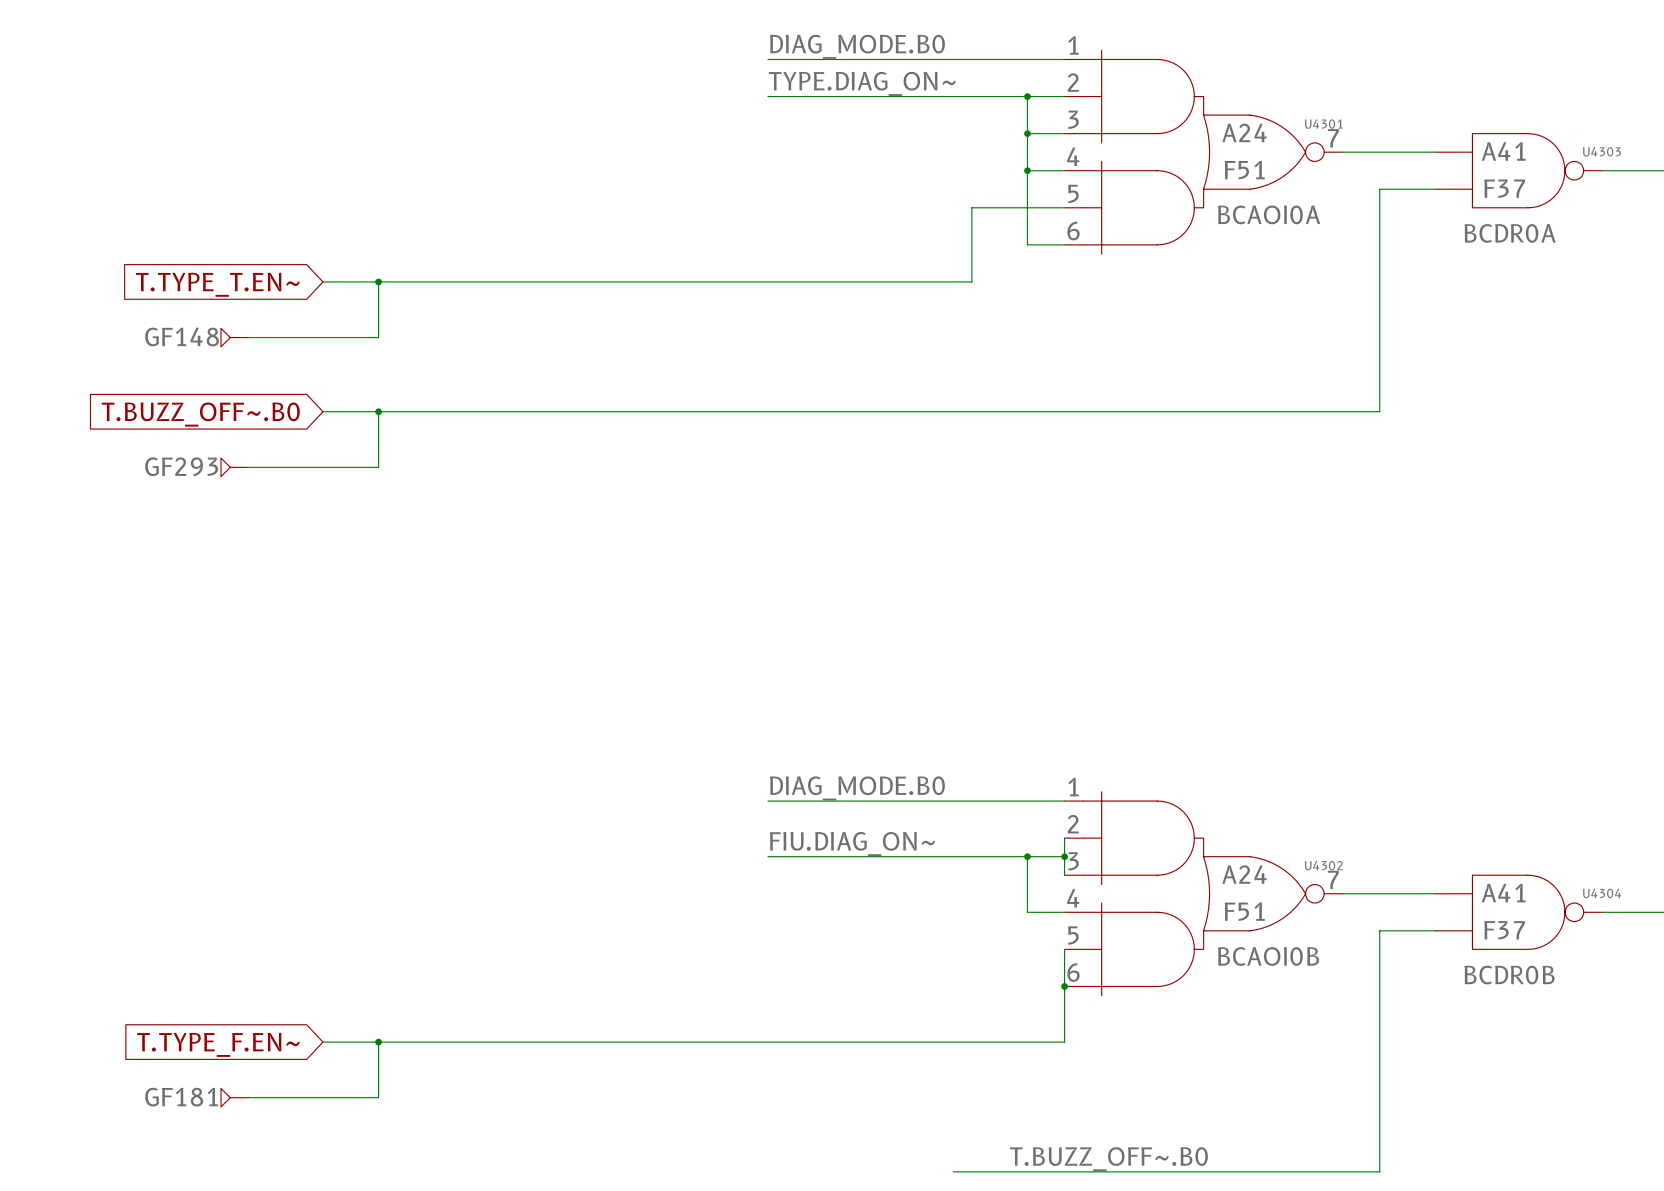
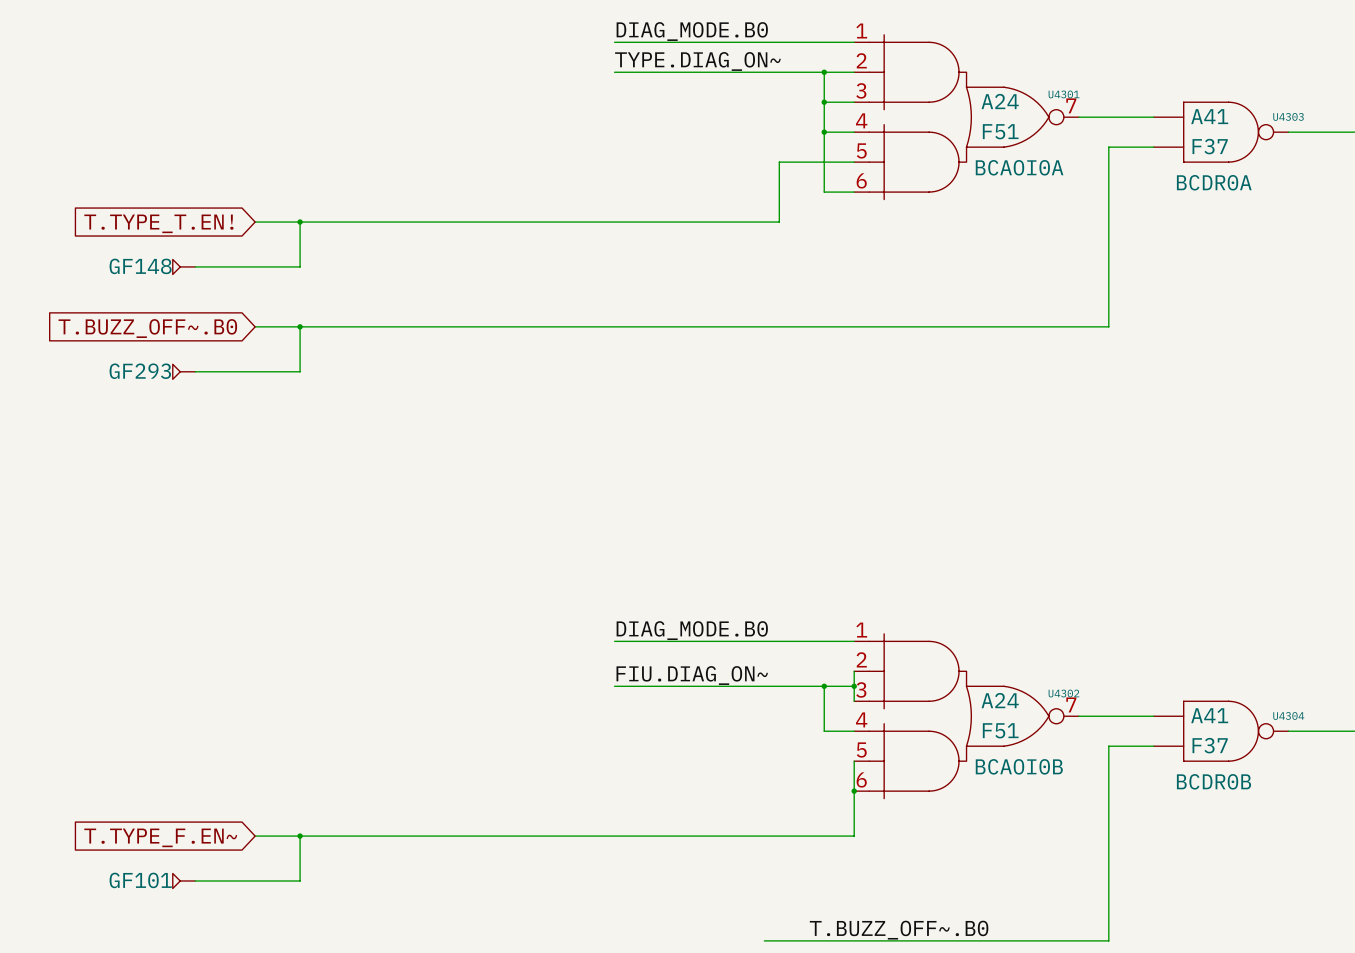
global label: T.TYPE_T.EN~ (217, 284) -> T.TYPE_T.EN! (158, 223)
GF181 name: GF181 (181, 1097) -> GF101 (140, 880)

